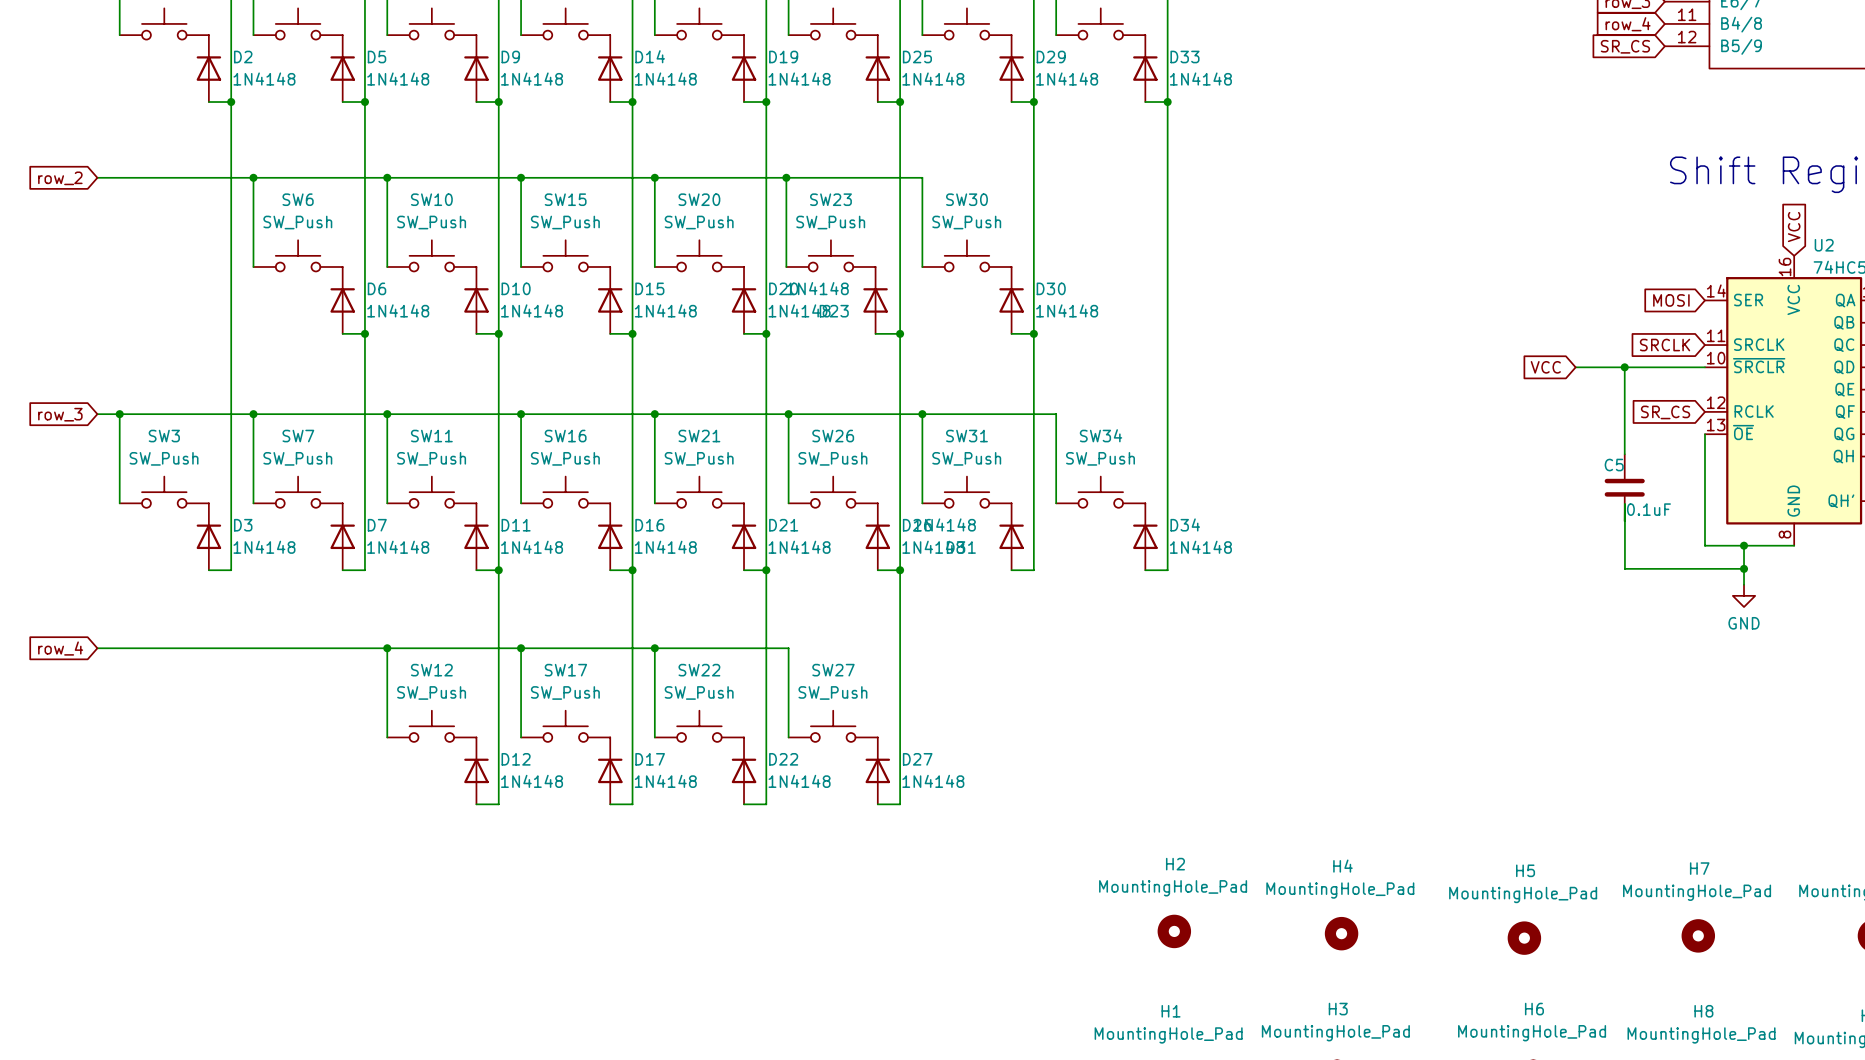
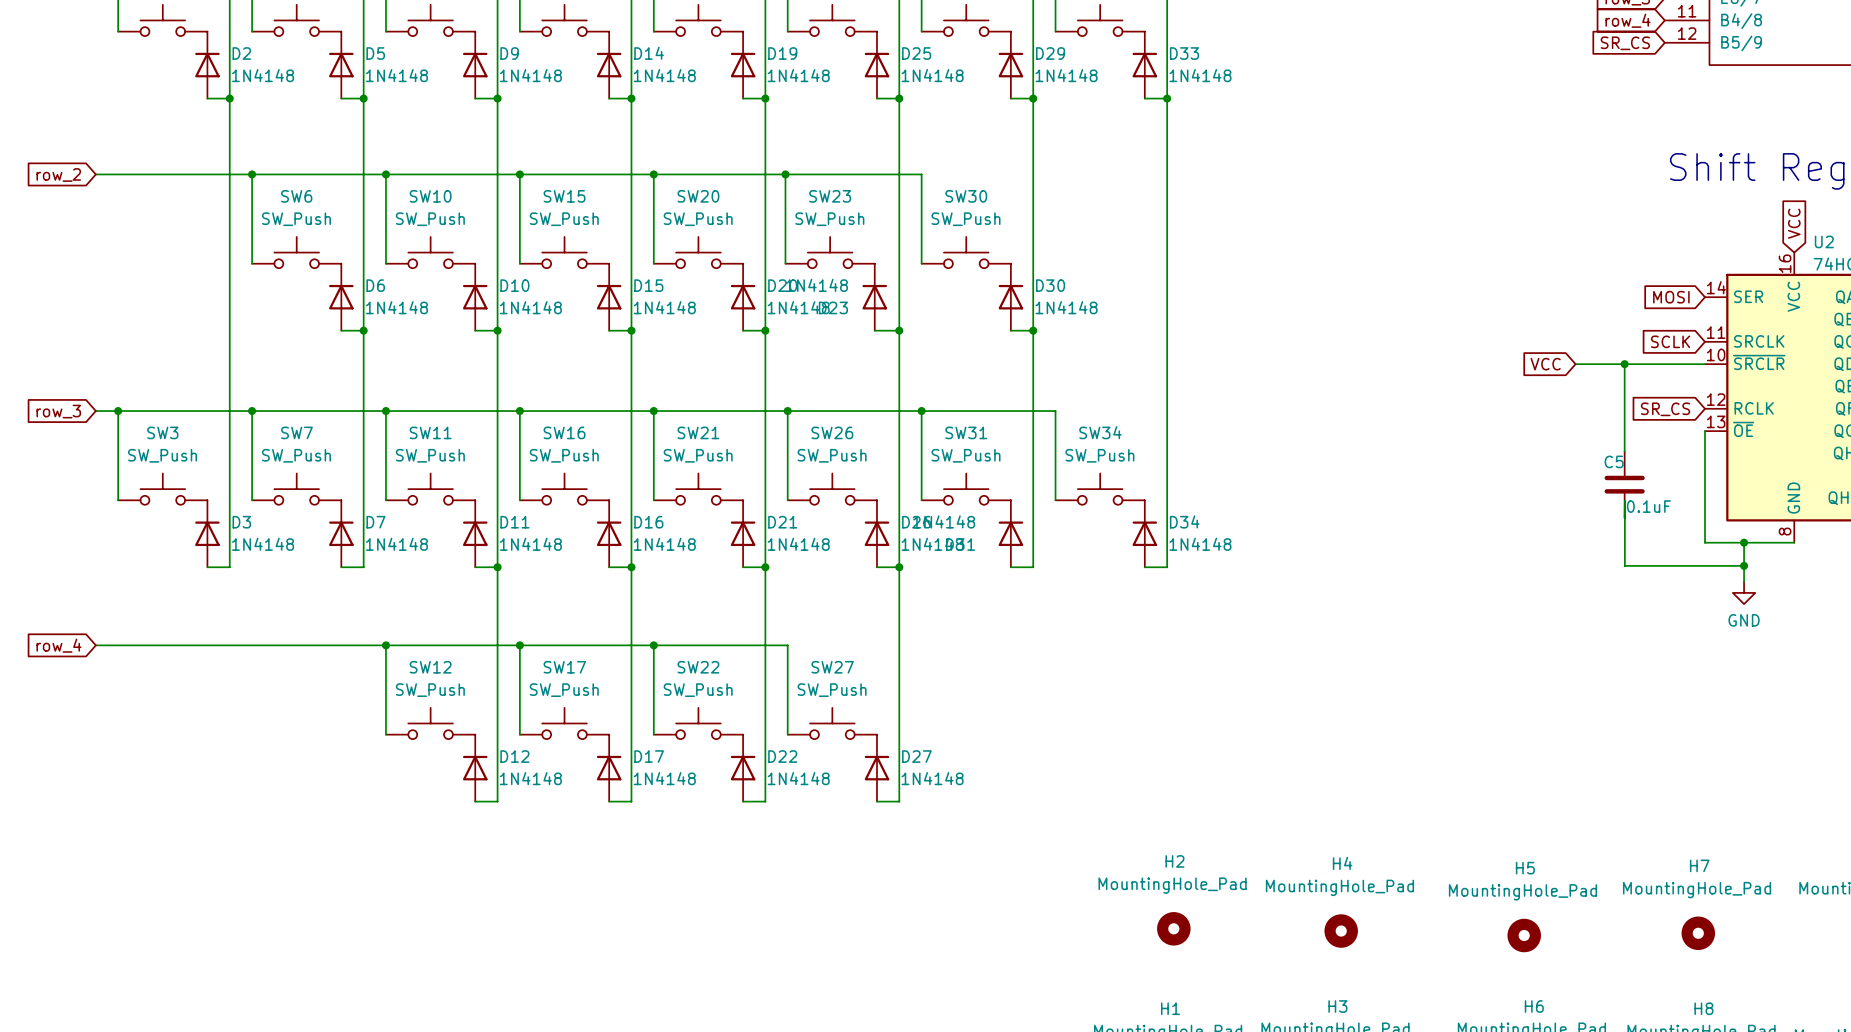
global label: SRCLK (1665, 345) -> SCLK (1670, 341)

